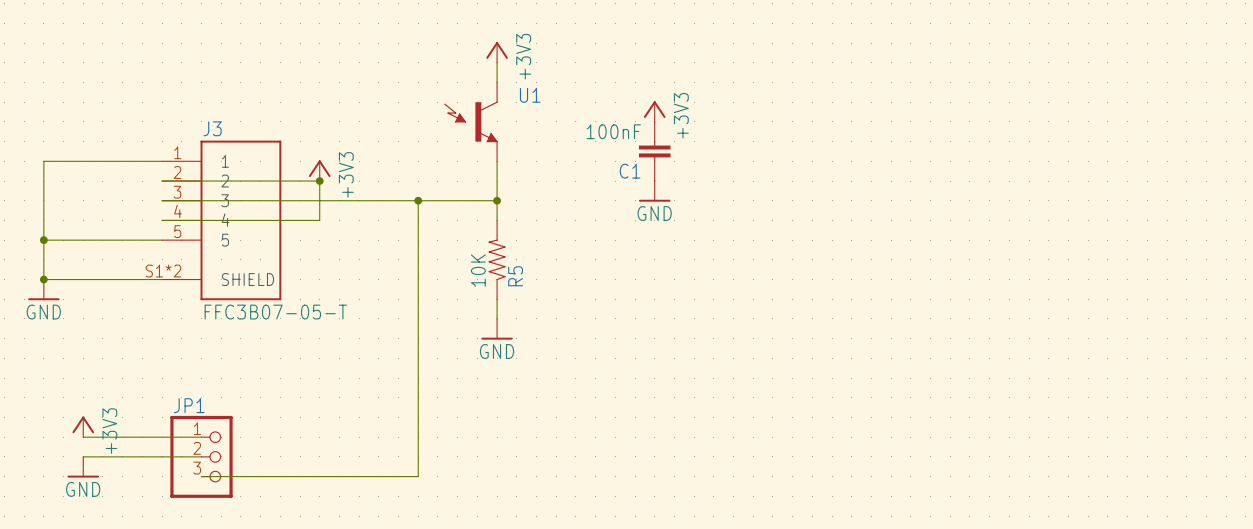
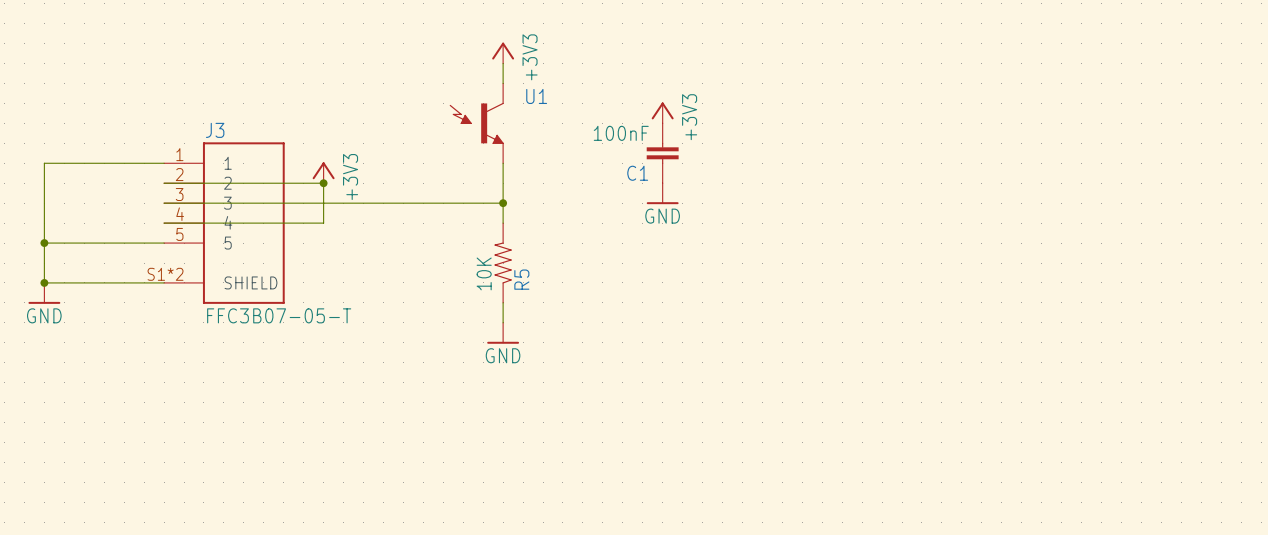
wire: (418, 200) (418, 476) (201, 476) -> none
junction: (418, 200) -> none
power symbol: +3V3 (83, 426) -> none
wire: (83, 437) (201, 437) -> none
wire: (83, 456) (201, 456) -> none
JP1: (201, 456) -> none
power symbol: GND (83, 467) -> none

